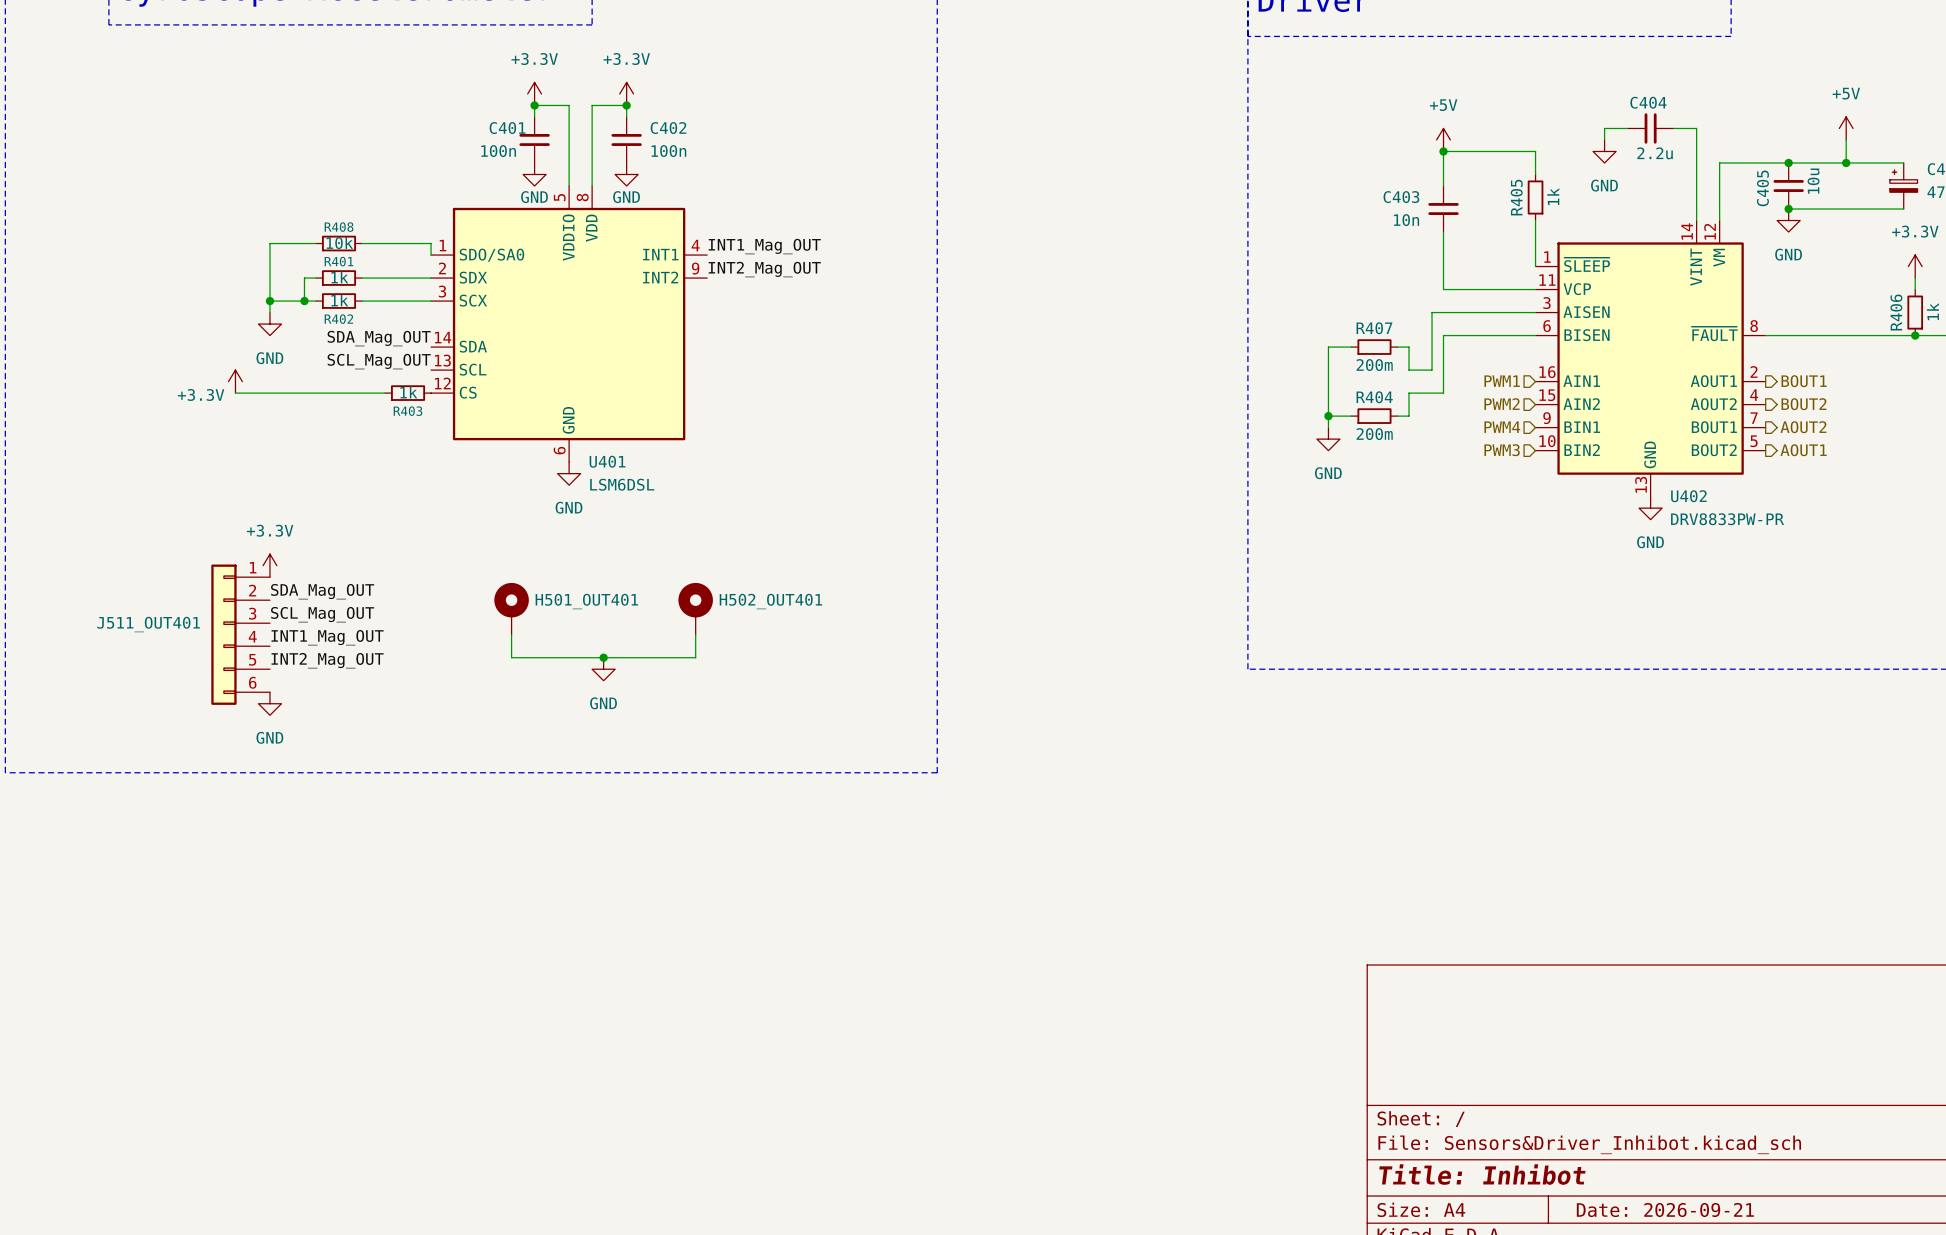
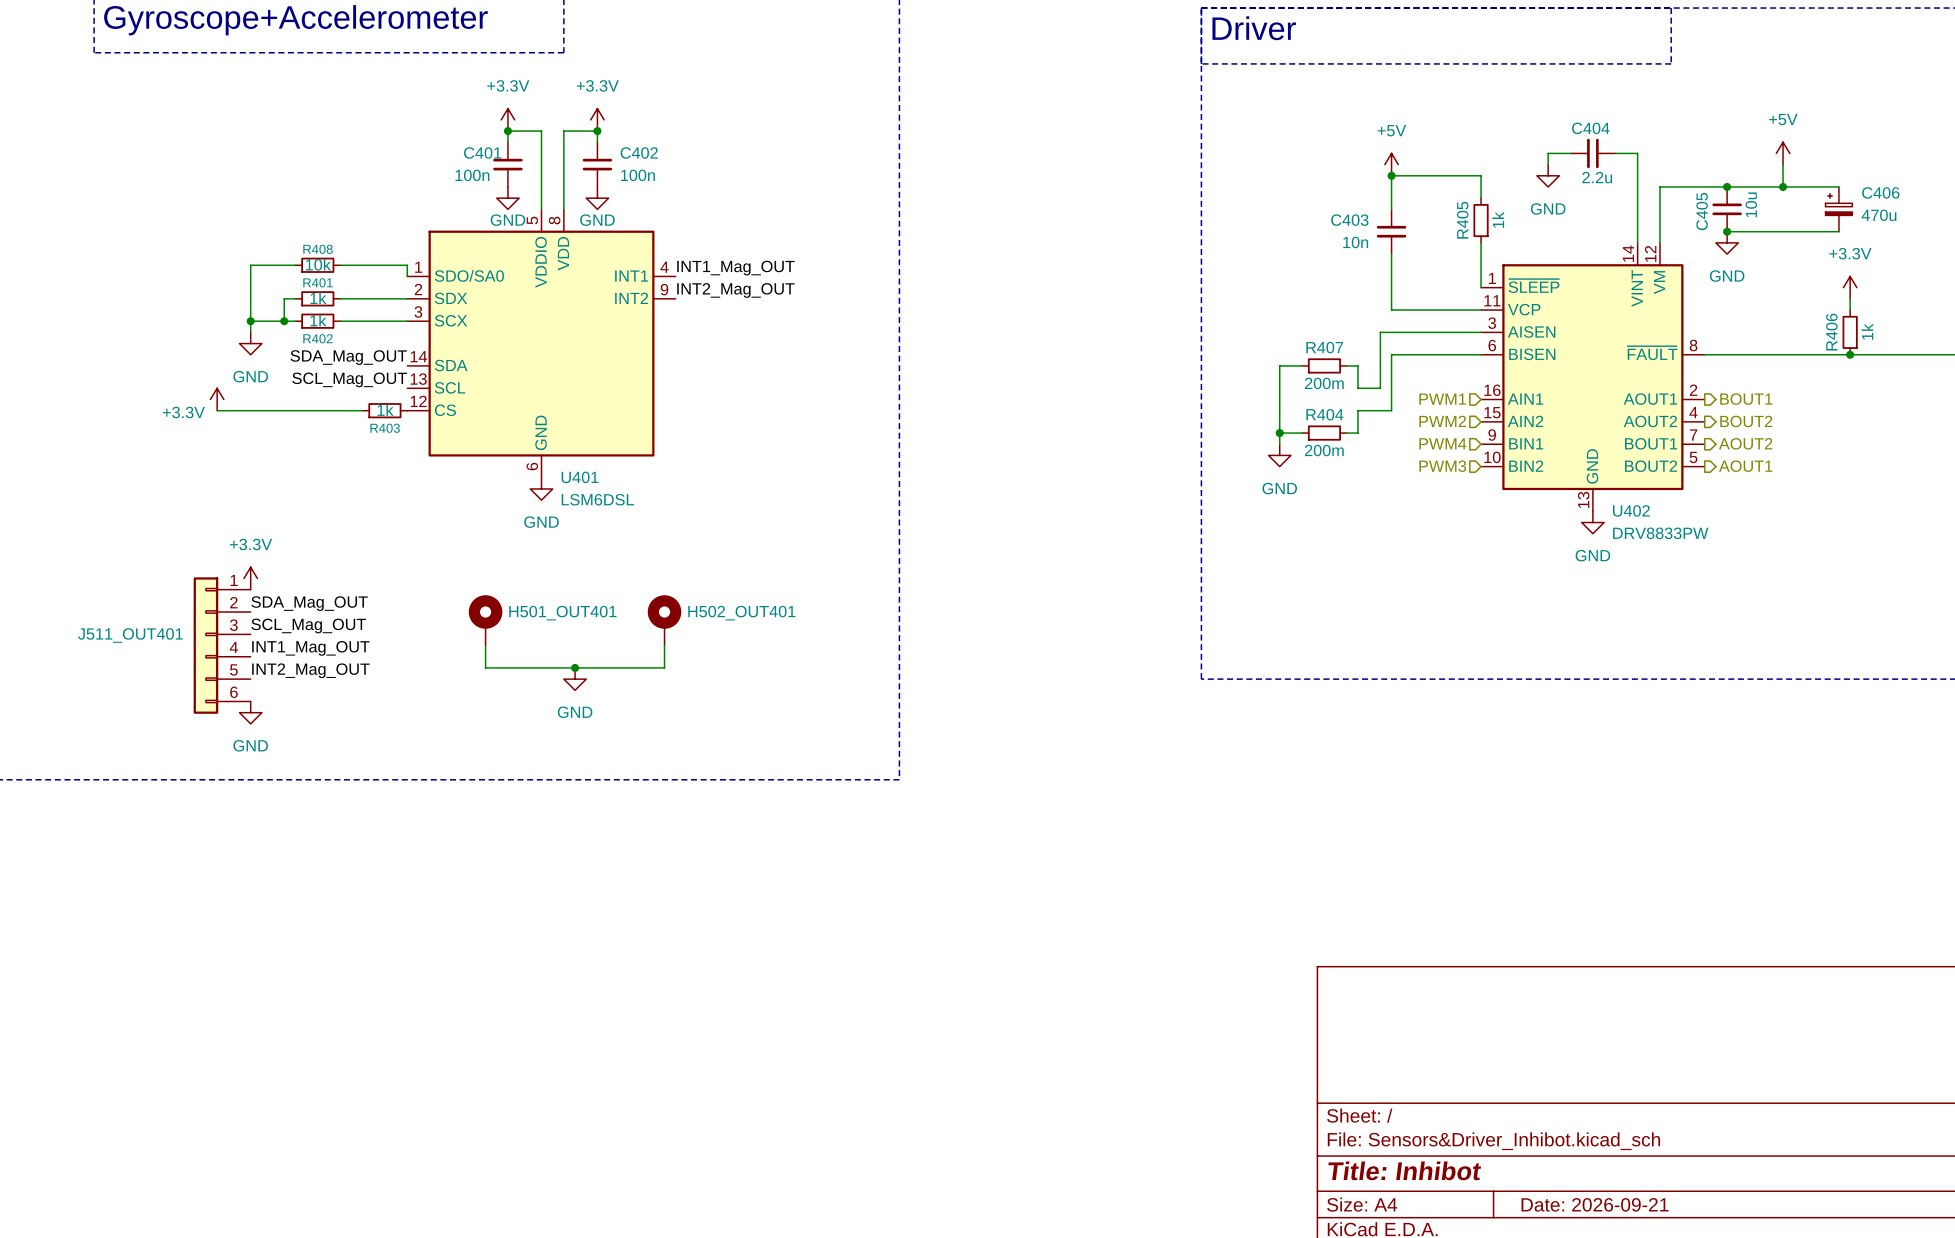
U402 value: DRV8833PW-PR (1727, 519) -> DRV8833PW (1660, 533)

